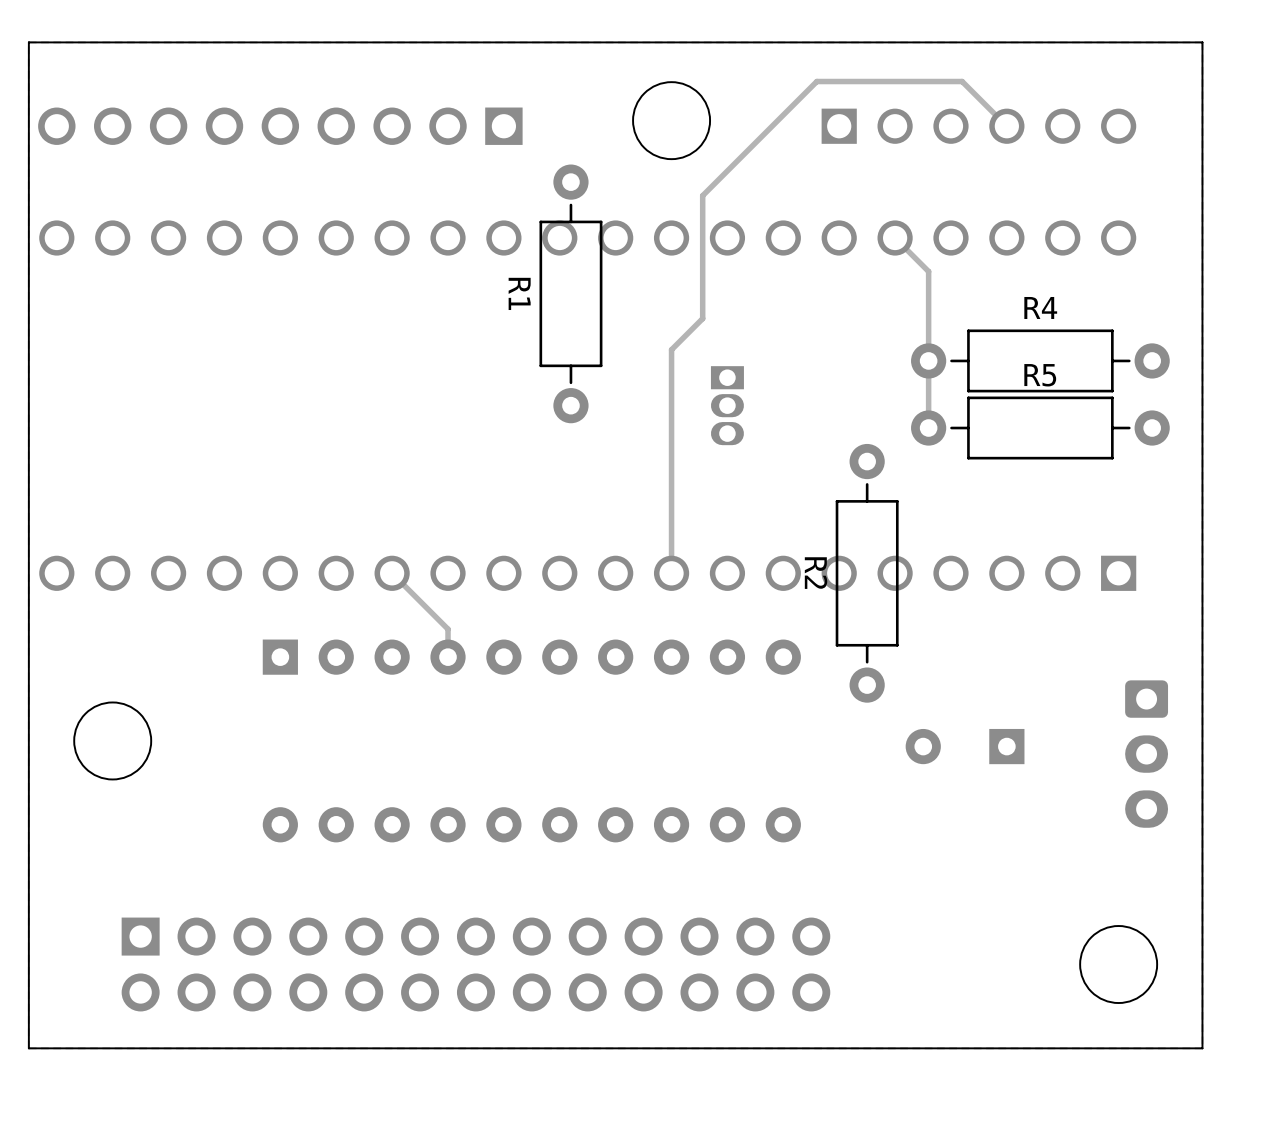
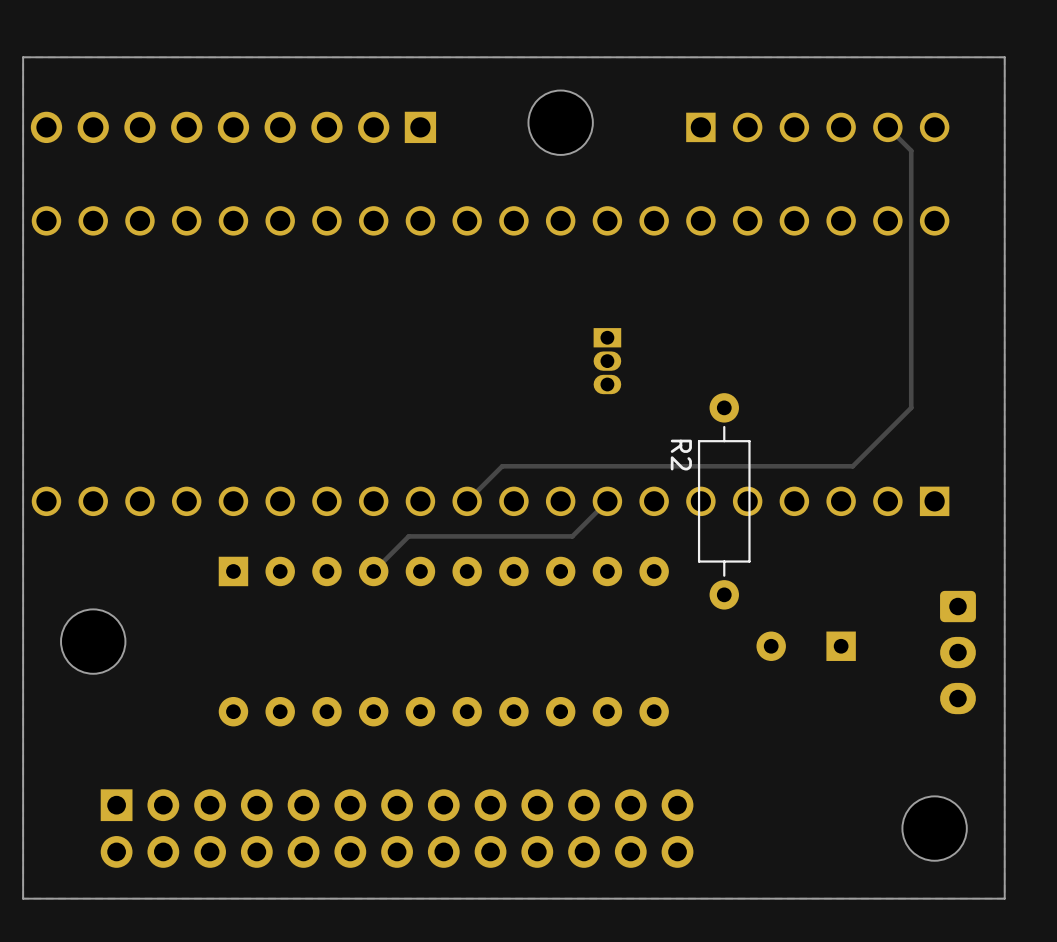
track: (1006, 126) (962, 81) (816, 81) (702, 195) (702, 318) (671, 349) (671, 573) -> none
track: none -> (887, 127) (911, 150) (911, 407) (852, 466) (502, 466) (467, 501)
track: (895, 238) (928, 271) (928, 428) -> none
R1: (570, 293) -> none
R4: (1040, 360) -> none
R5: (1040, 428) -> none
track: (392, 573) (448, 629) (448, 657) -> (607, 501) (572, 536) (408, 536) (373, 571)
R2 name position: R2 (816, 573) -> R2 (681, 455)

